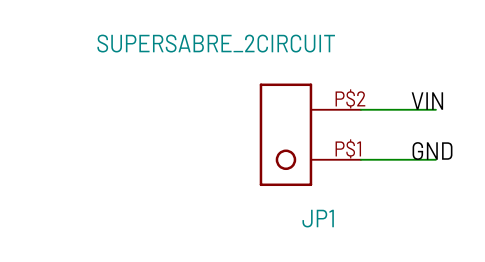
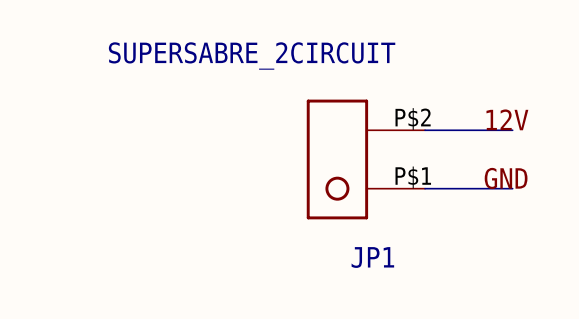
label: VIN (427, 101) -> 12V (507, 119)

